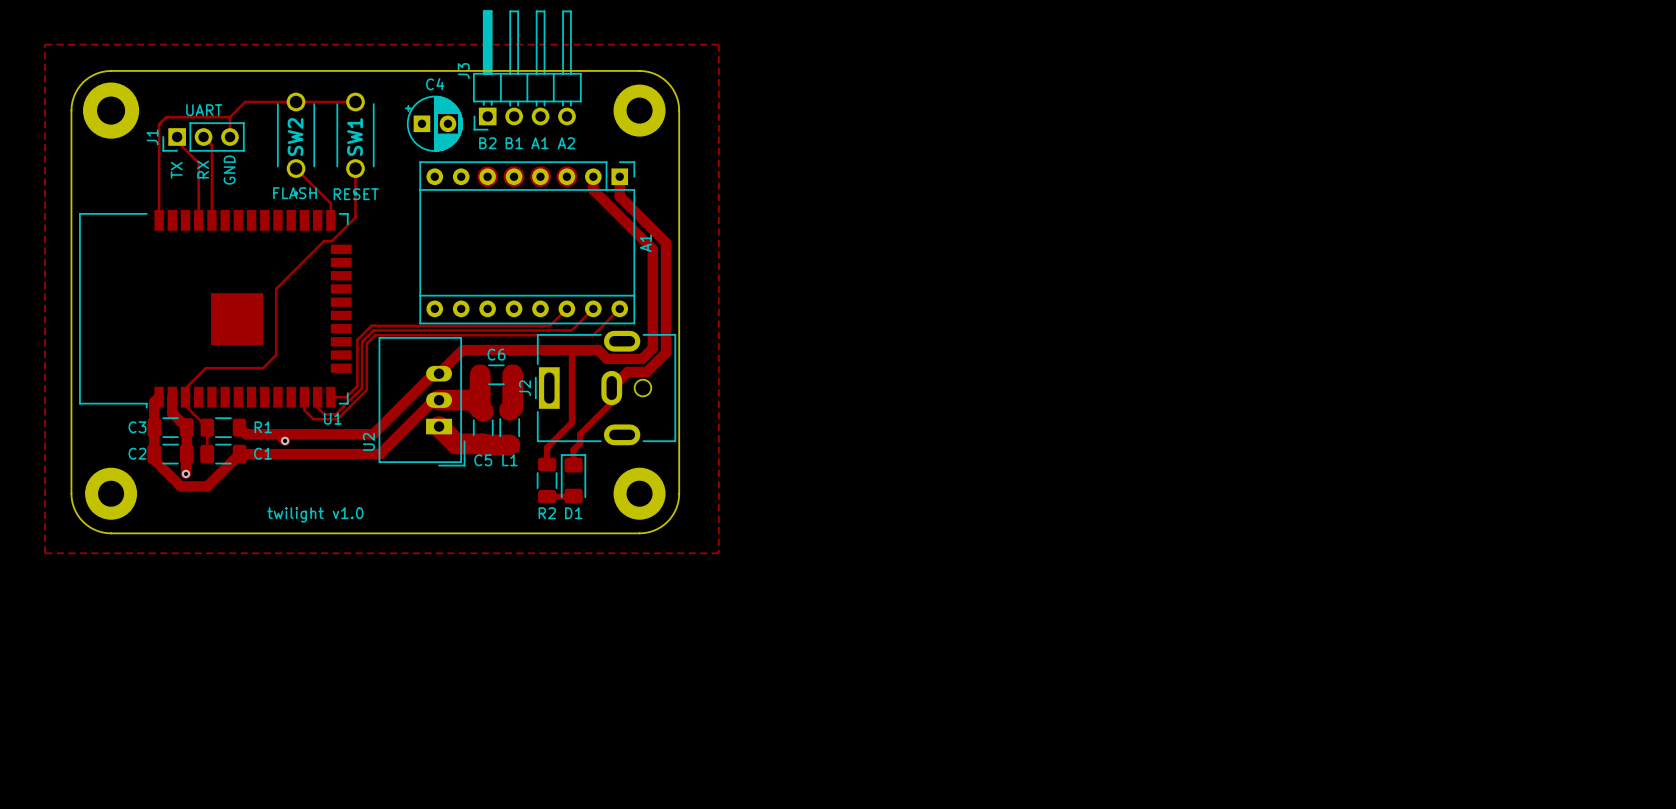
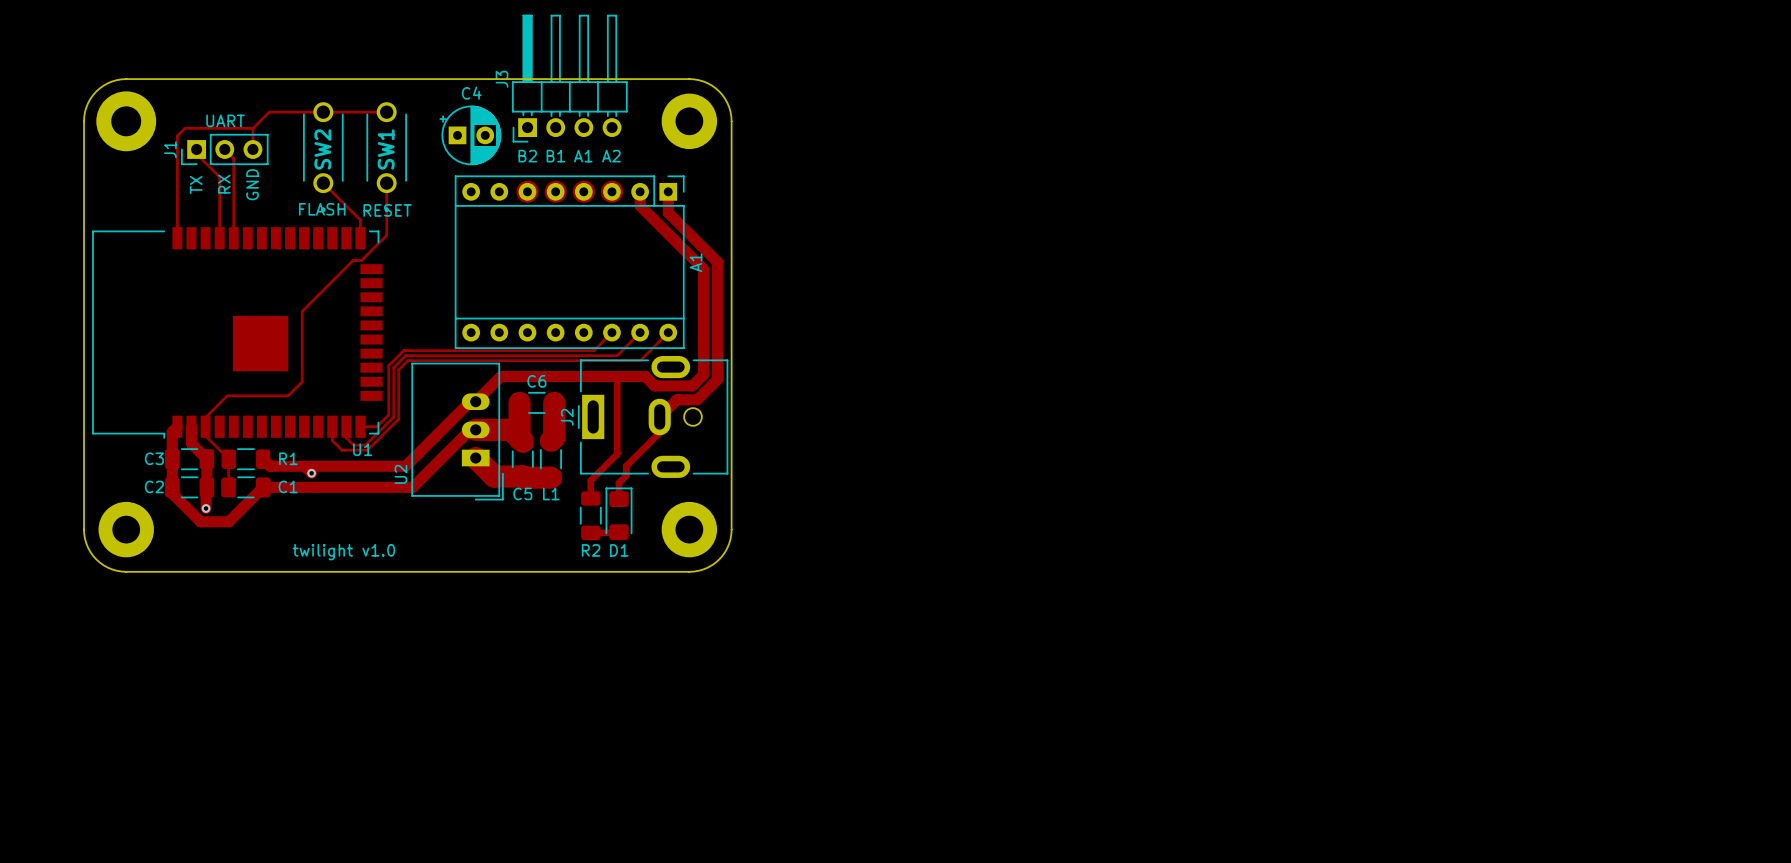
zone outline: (45, 44) (45, 553) (718, 553) (718, 44) (45, 44) -> none

